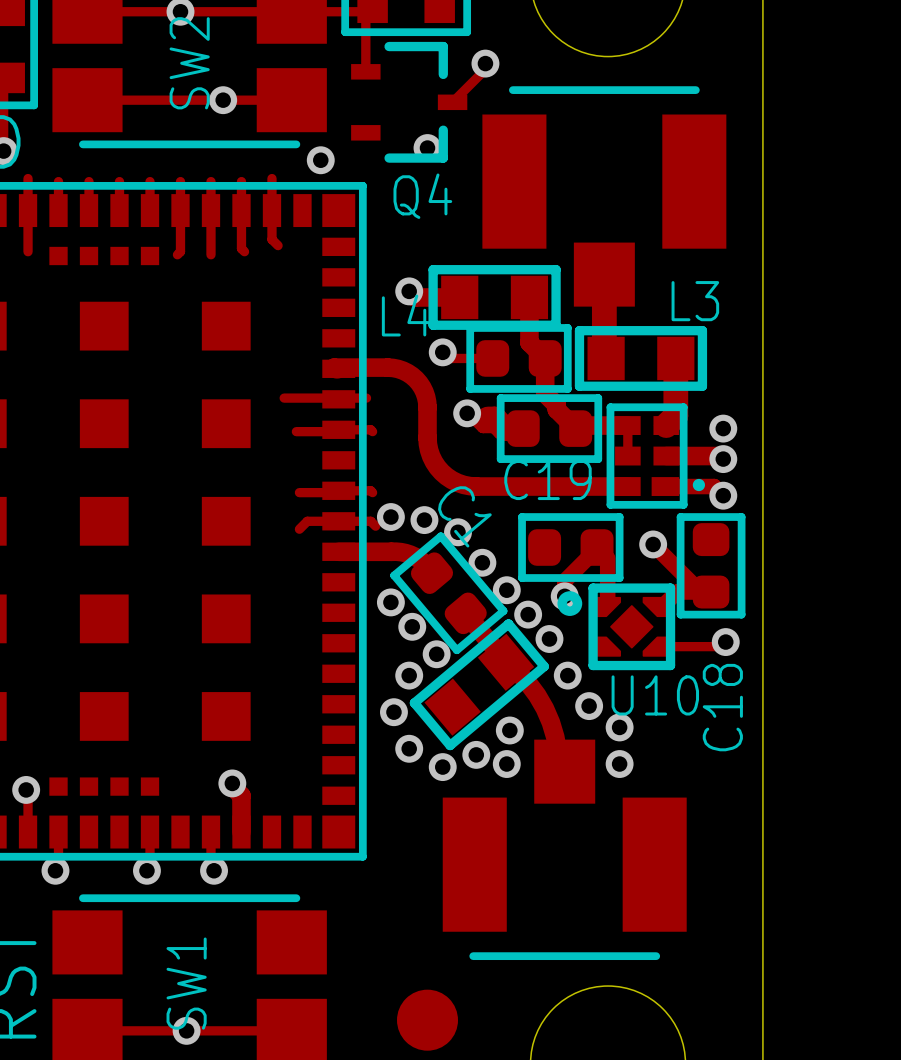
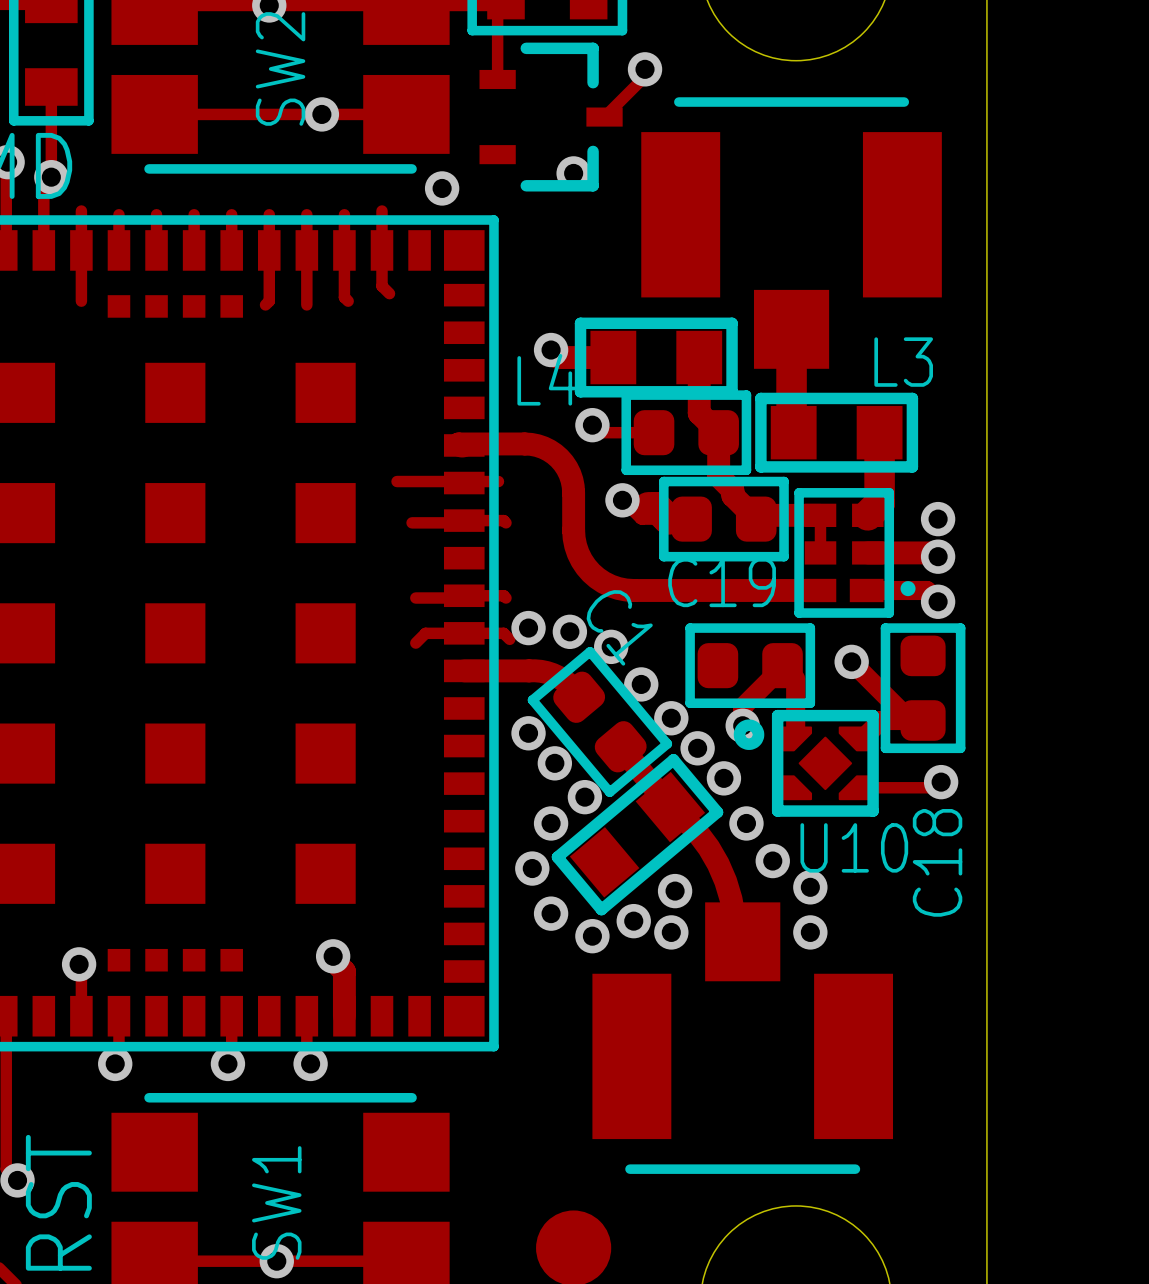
Q4 name: Q4 (422, 196) -> none

